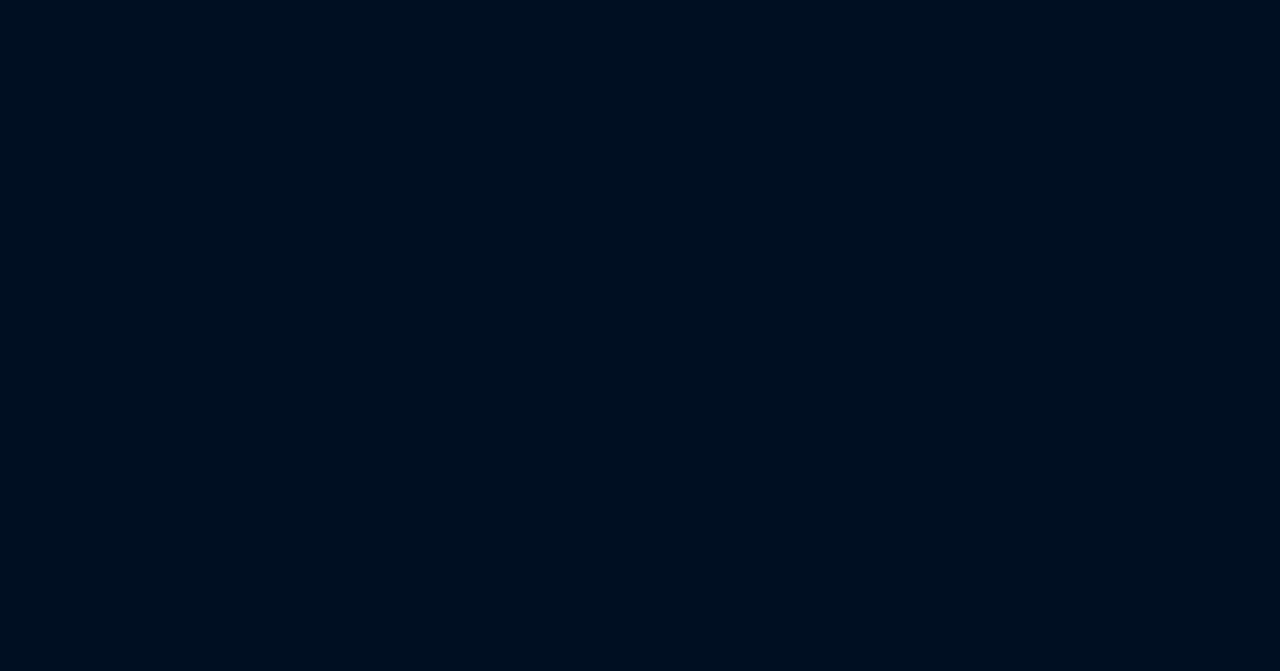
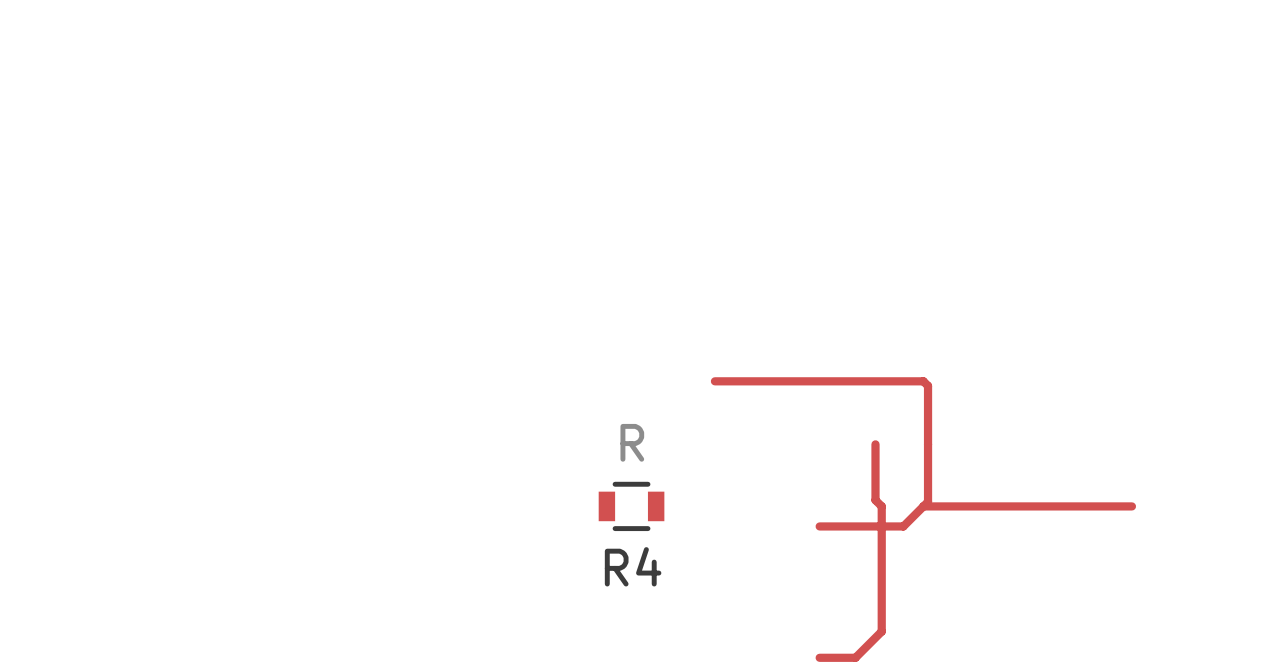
top track: none -> (714, 381) (923, 381) (928, 385) (928, 501) (903, 526) (819, 526)
top track: none -> (875, 444) (875, 500) (881, 506) (881, 631) (855, 657) (819, 657)
R4: none -> R (631, 506)
top track: none -> (923, 506) (1131, 506)

